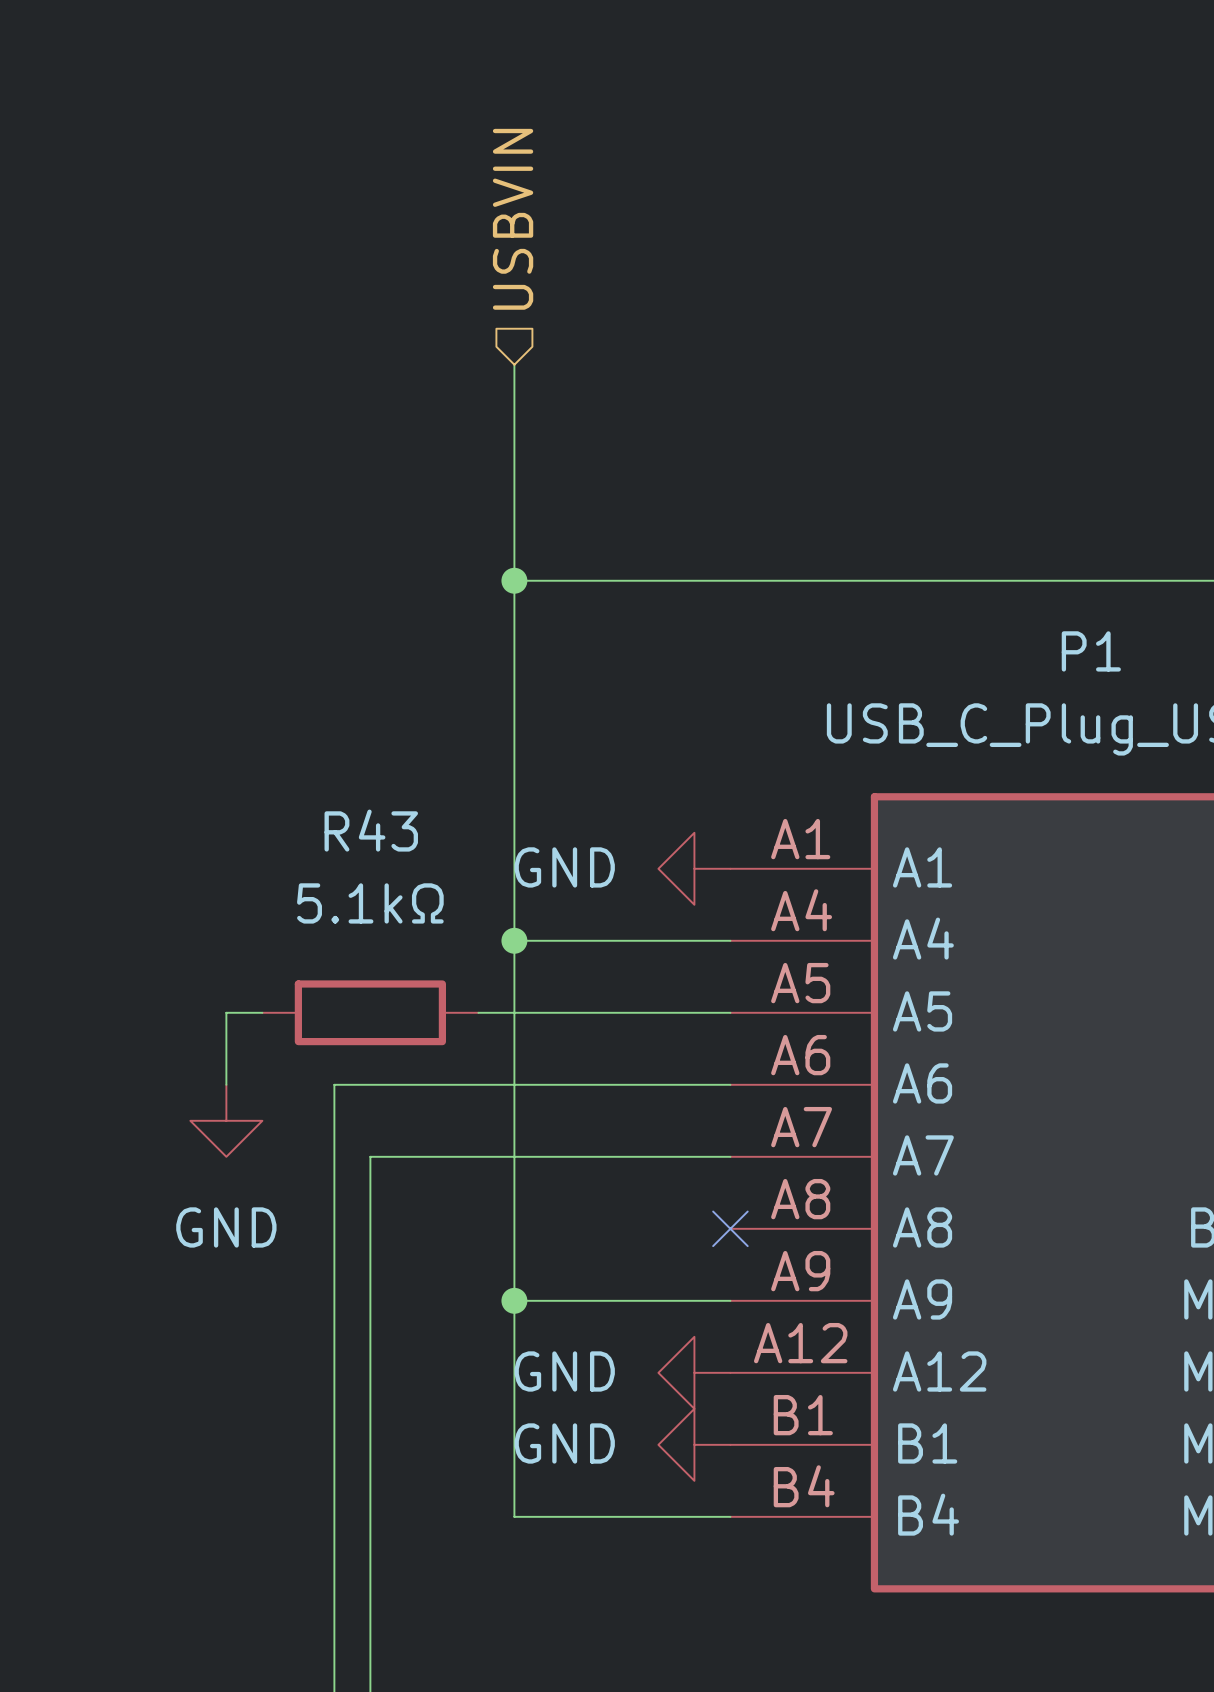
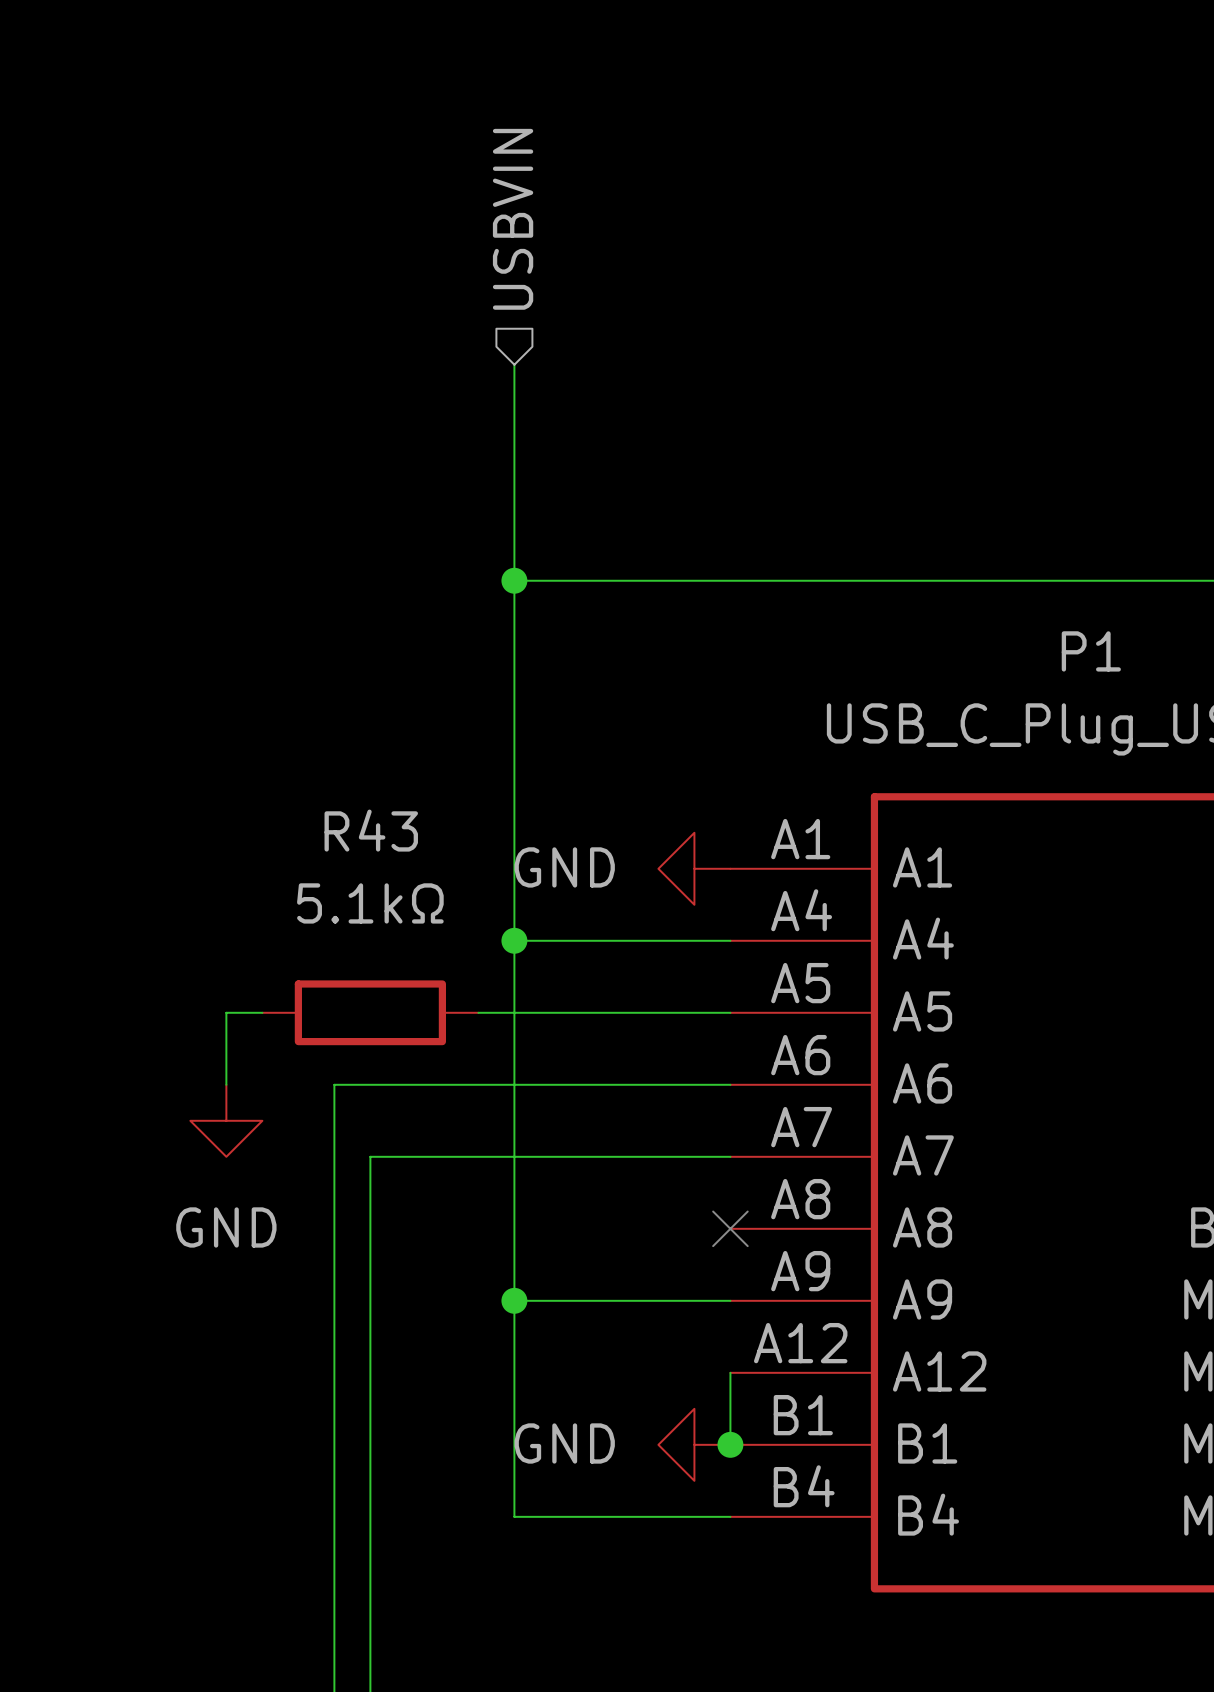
power symbol: GND (694, 1372) -> none
wire: none -> (730, 1372) (730, 1444)
junction: none -> (730, 1444)

